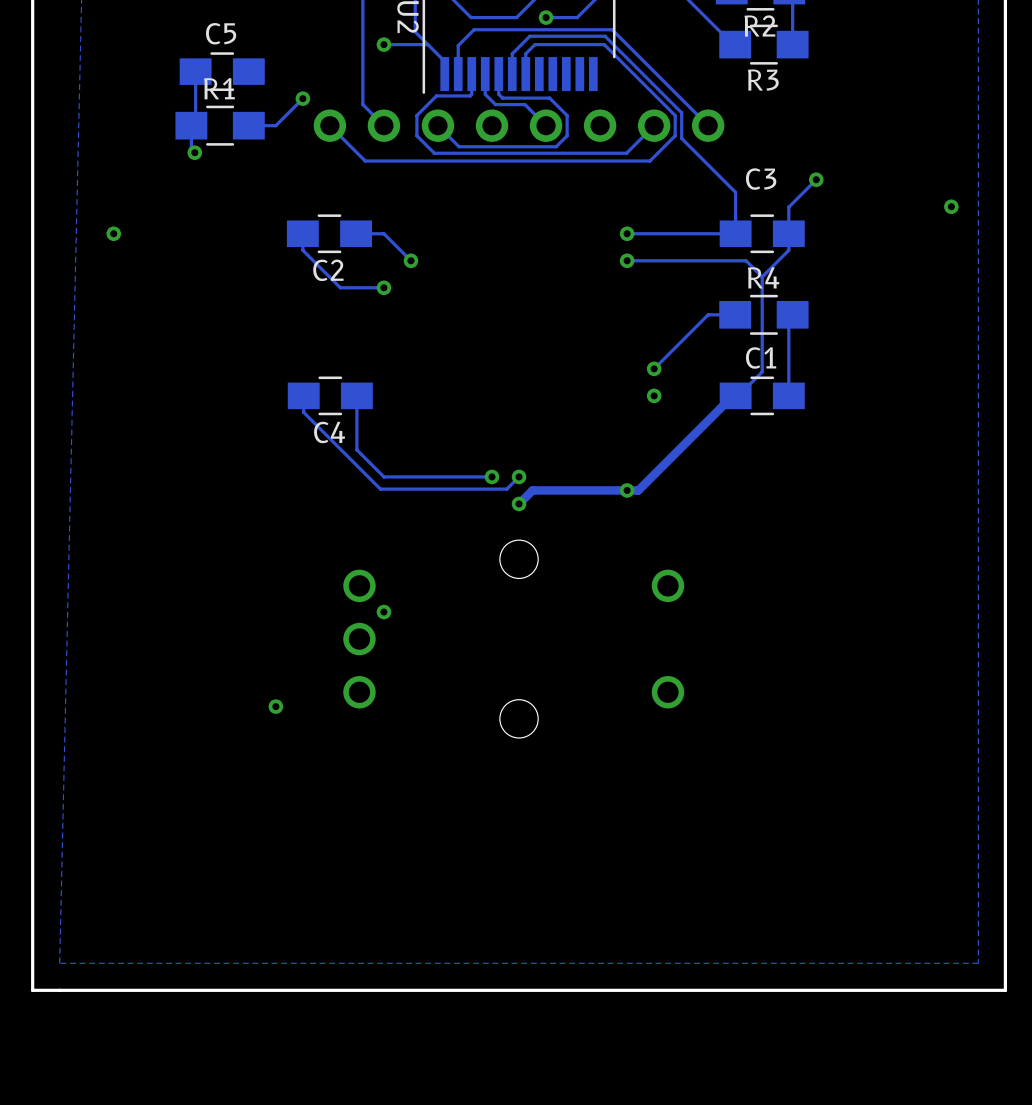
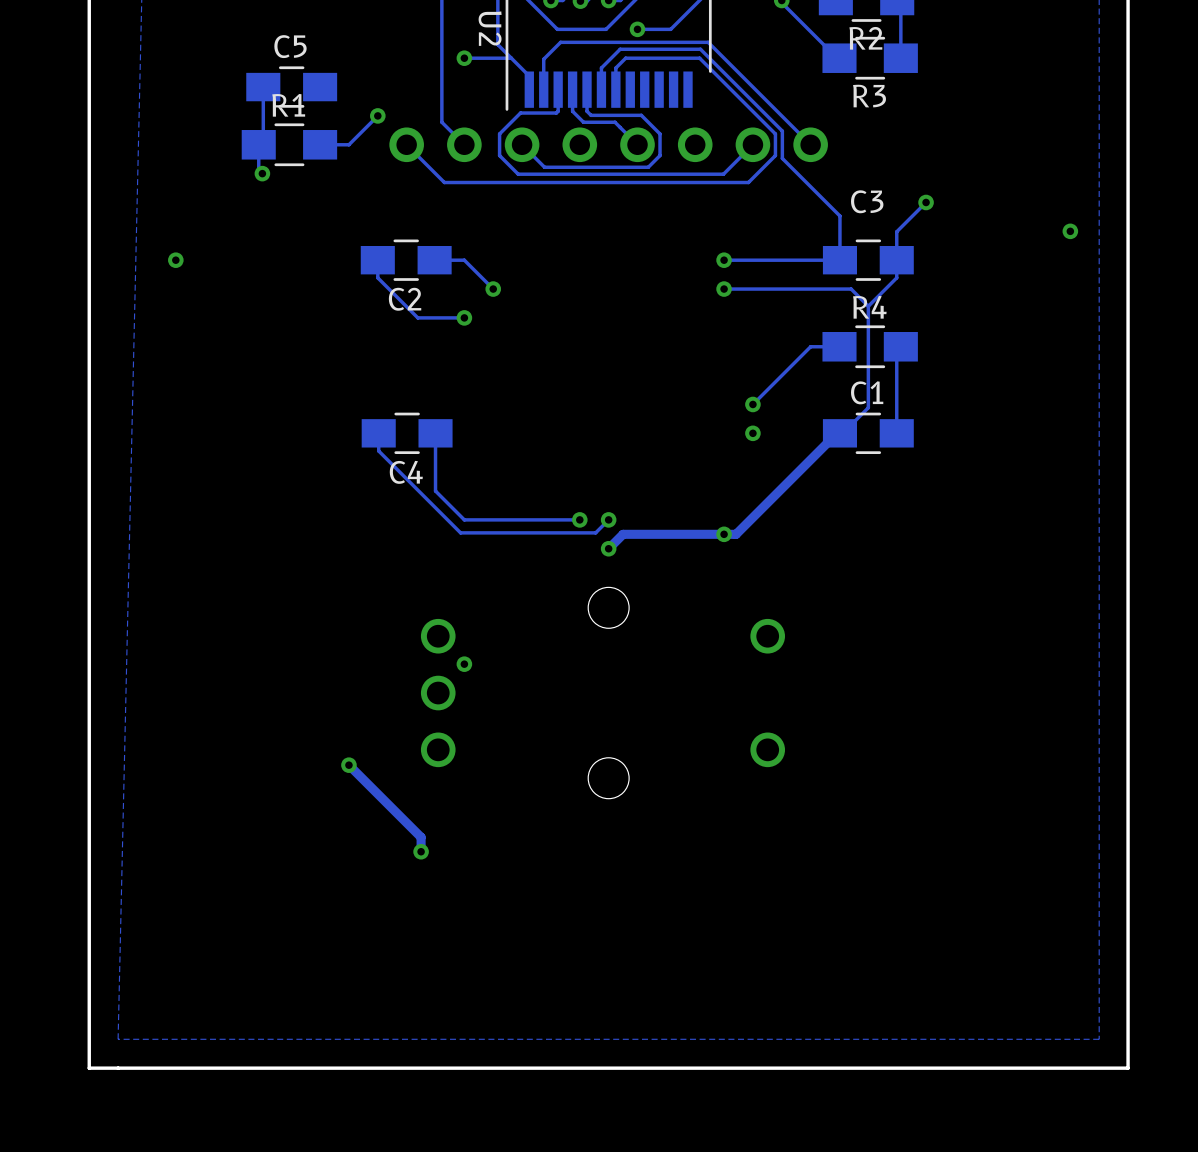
track: none -> (348, 765) (421, 837) (421, 851)
via: none -> (421, 851)

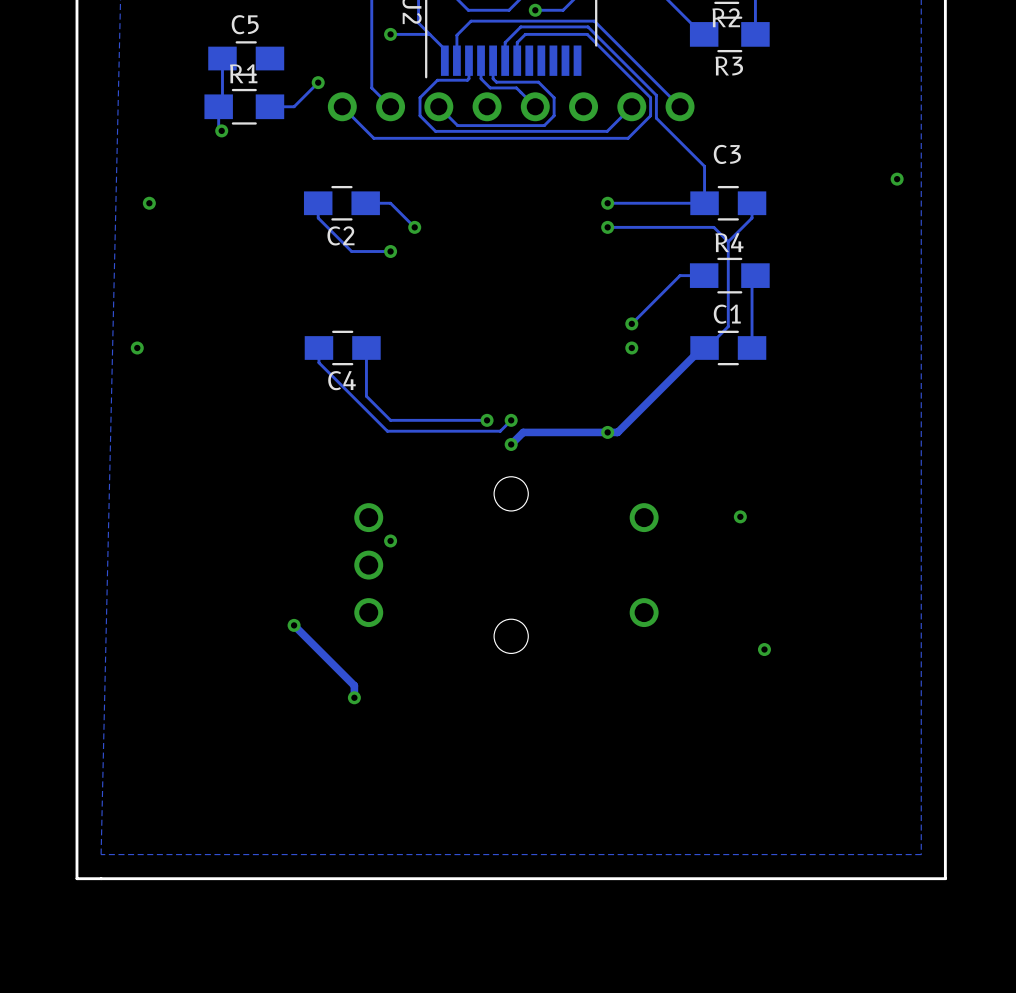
track: (926, 202) (896, 231) (896, 260) -> none
via: (926, 202) -> none
via: none -> (137, 347)
via: none -> (740, 516)
via: none -> (764, 649)

